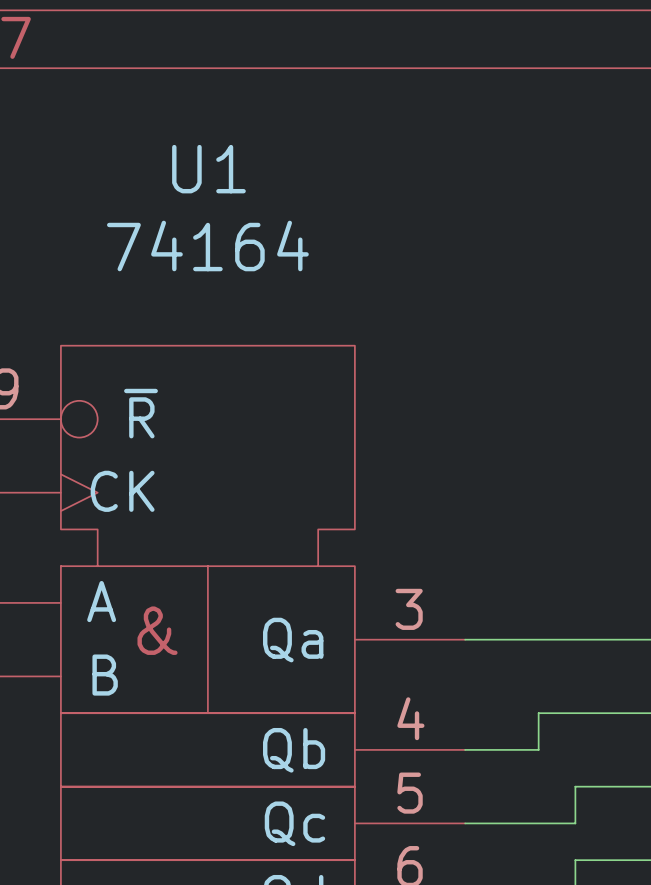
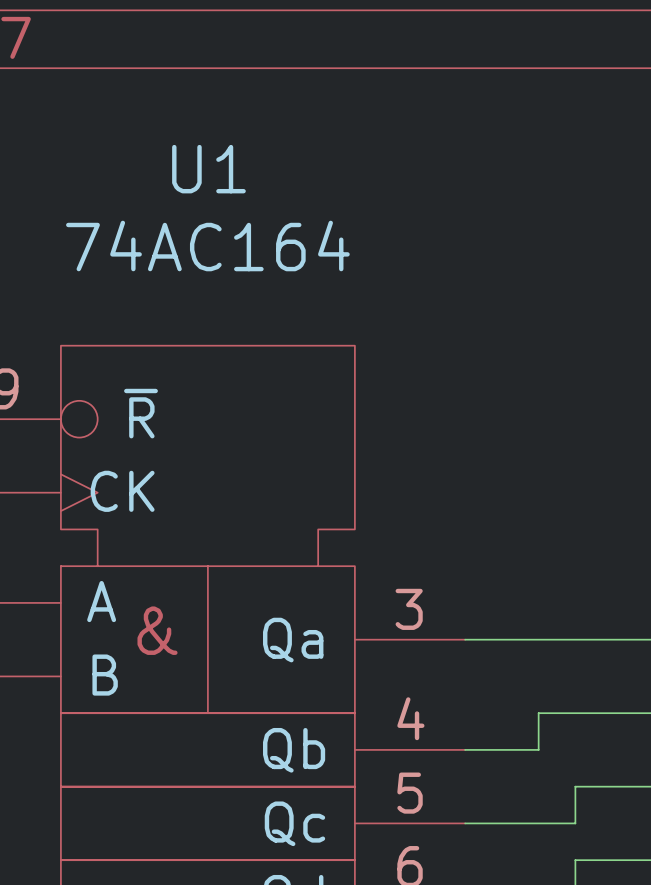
U1 value: 74164 (207, 245) -> 74AC164 (207, 245)

